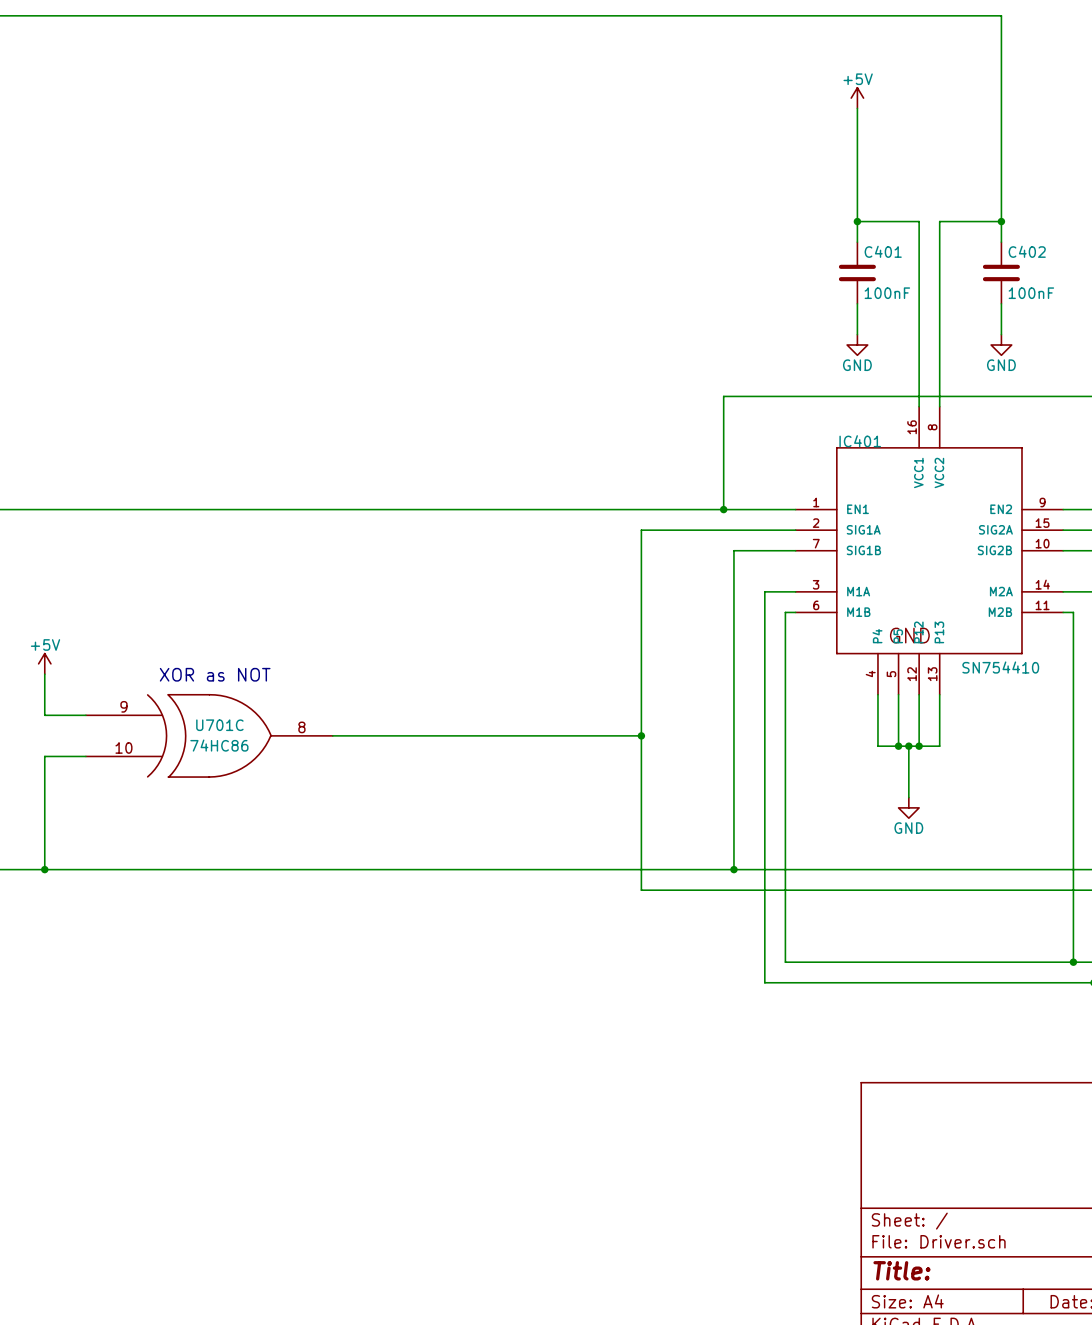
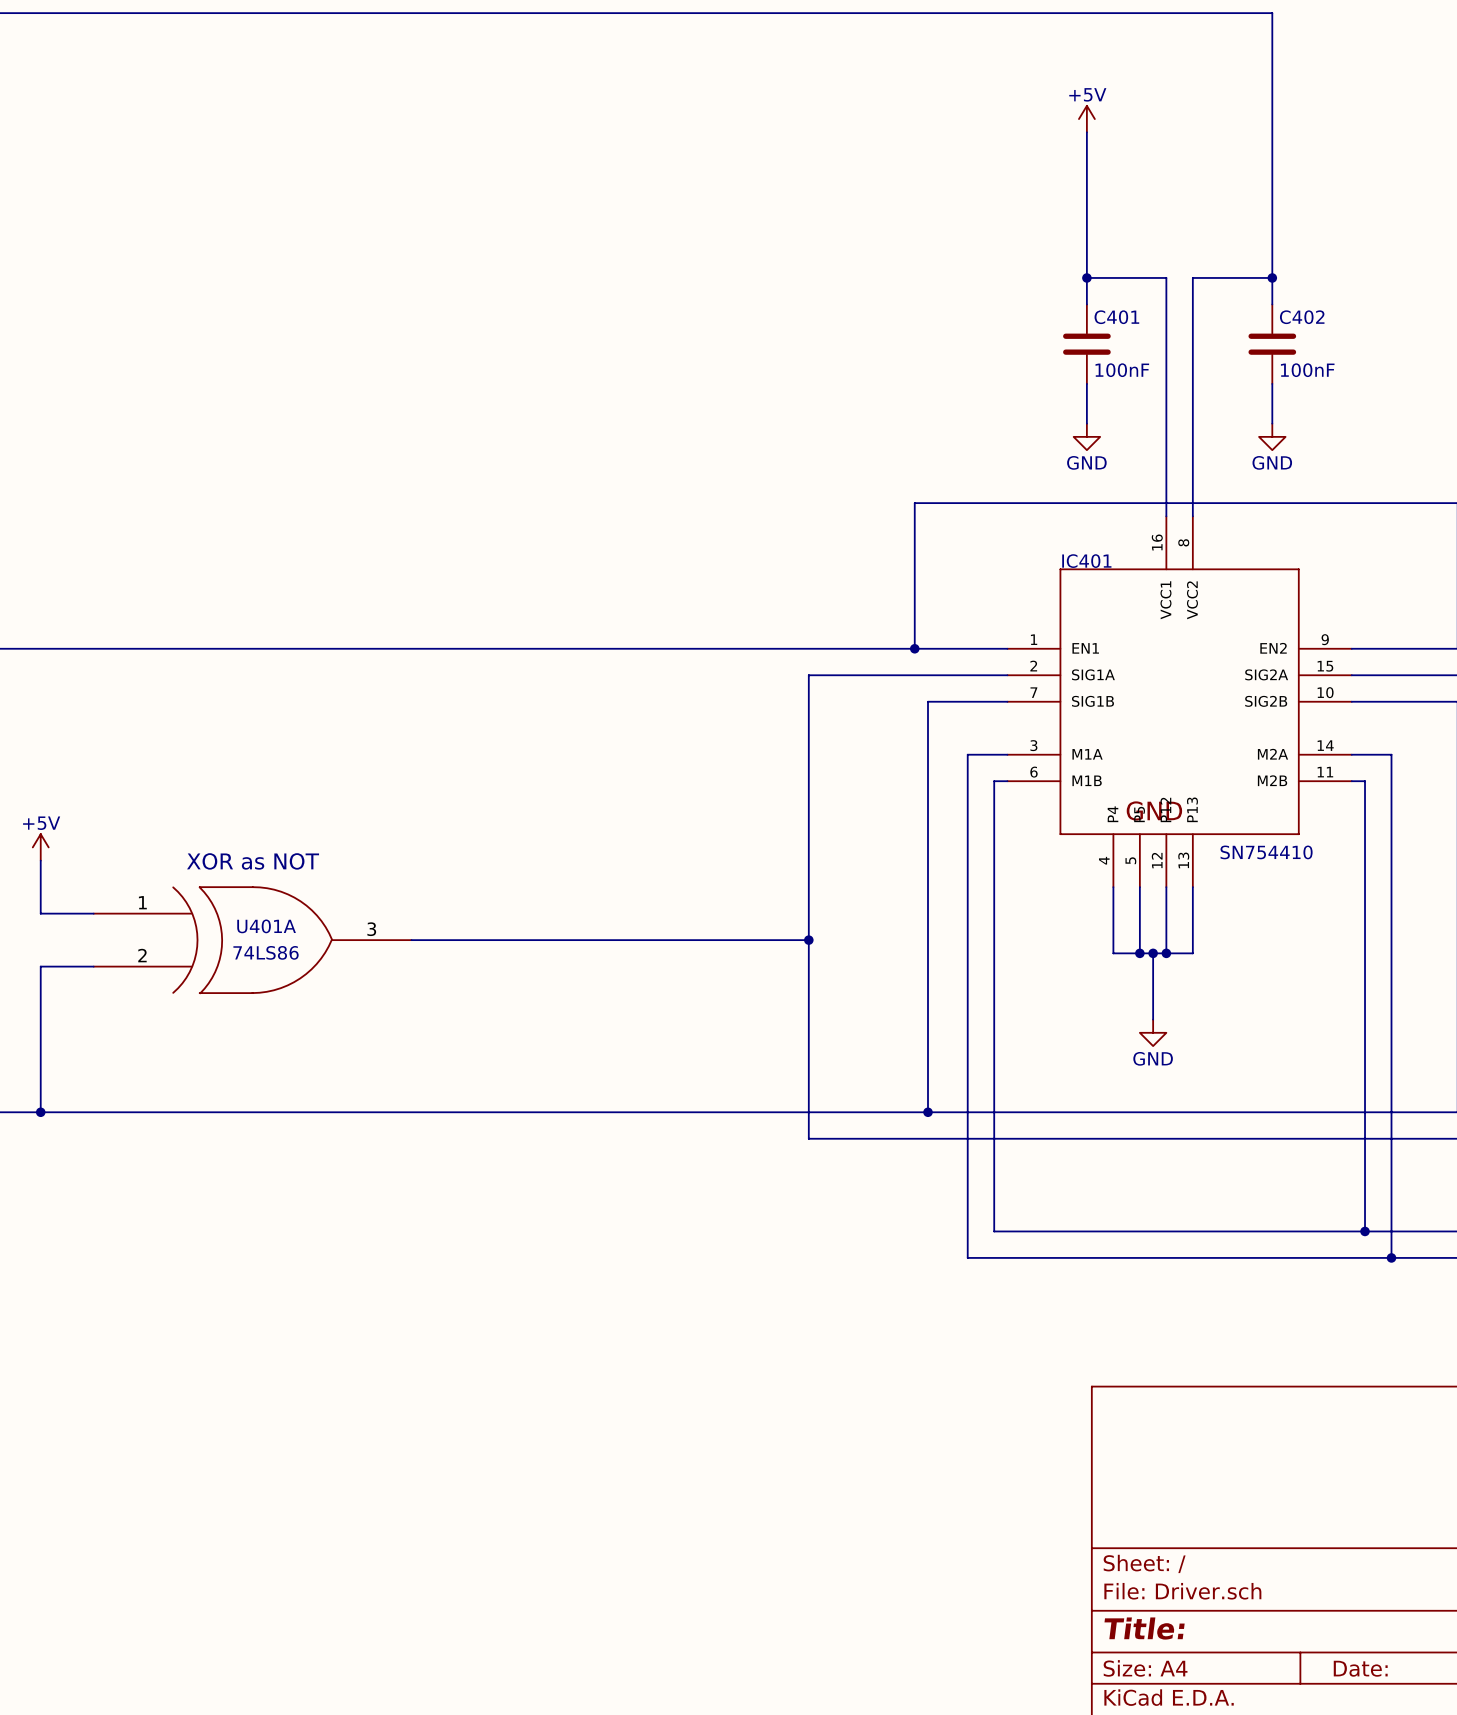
U701C pin number: 9 (123, 706) -> 1 (142, 902)
U701C name: U701C (219, 725) -> U401A (266, 926)
U701C pin number: 8 (301, 727) -> 3 (371, 929)
U701C value: 74HC86 (219, 745) -> 74LS86 (266, 952)
U701C pin number: 10 (123, 747) -> 2 (142, 955)

